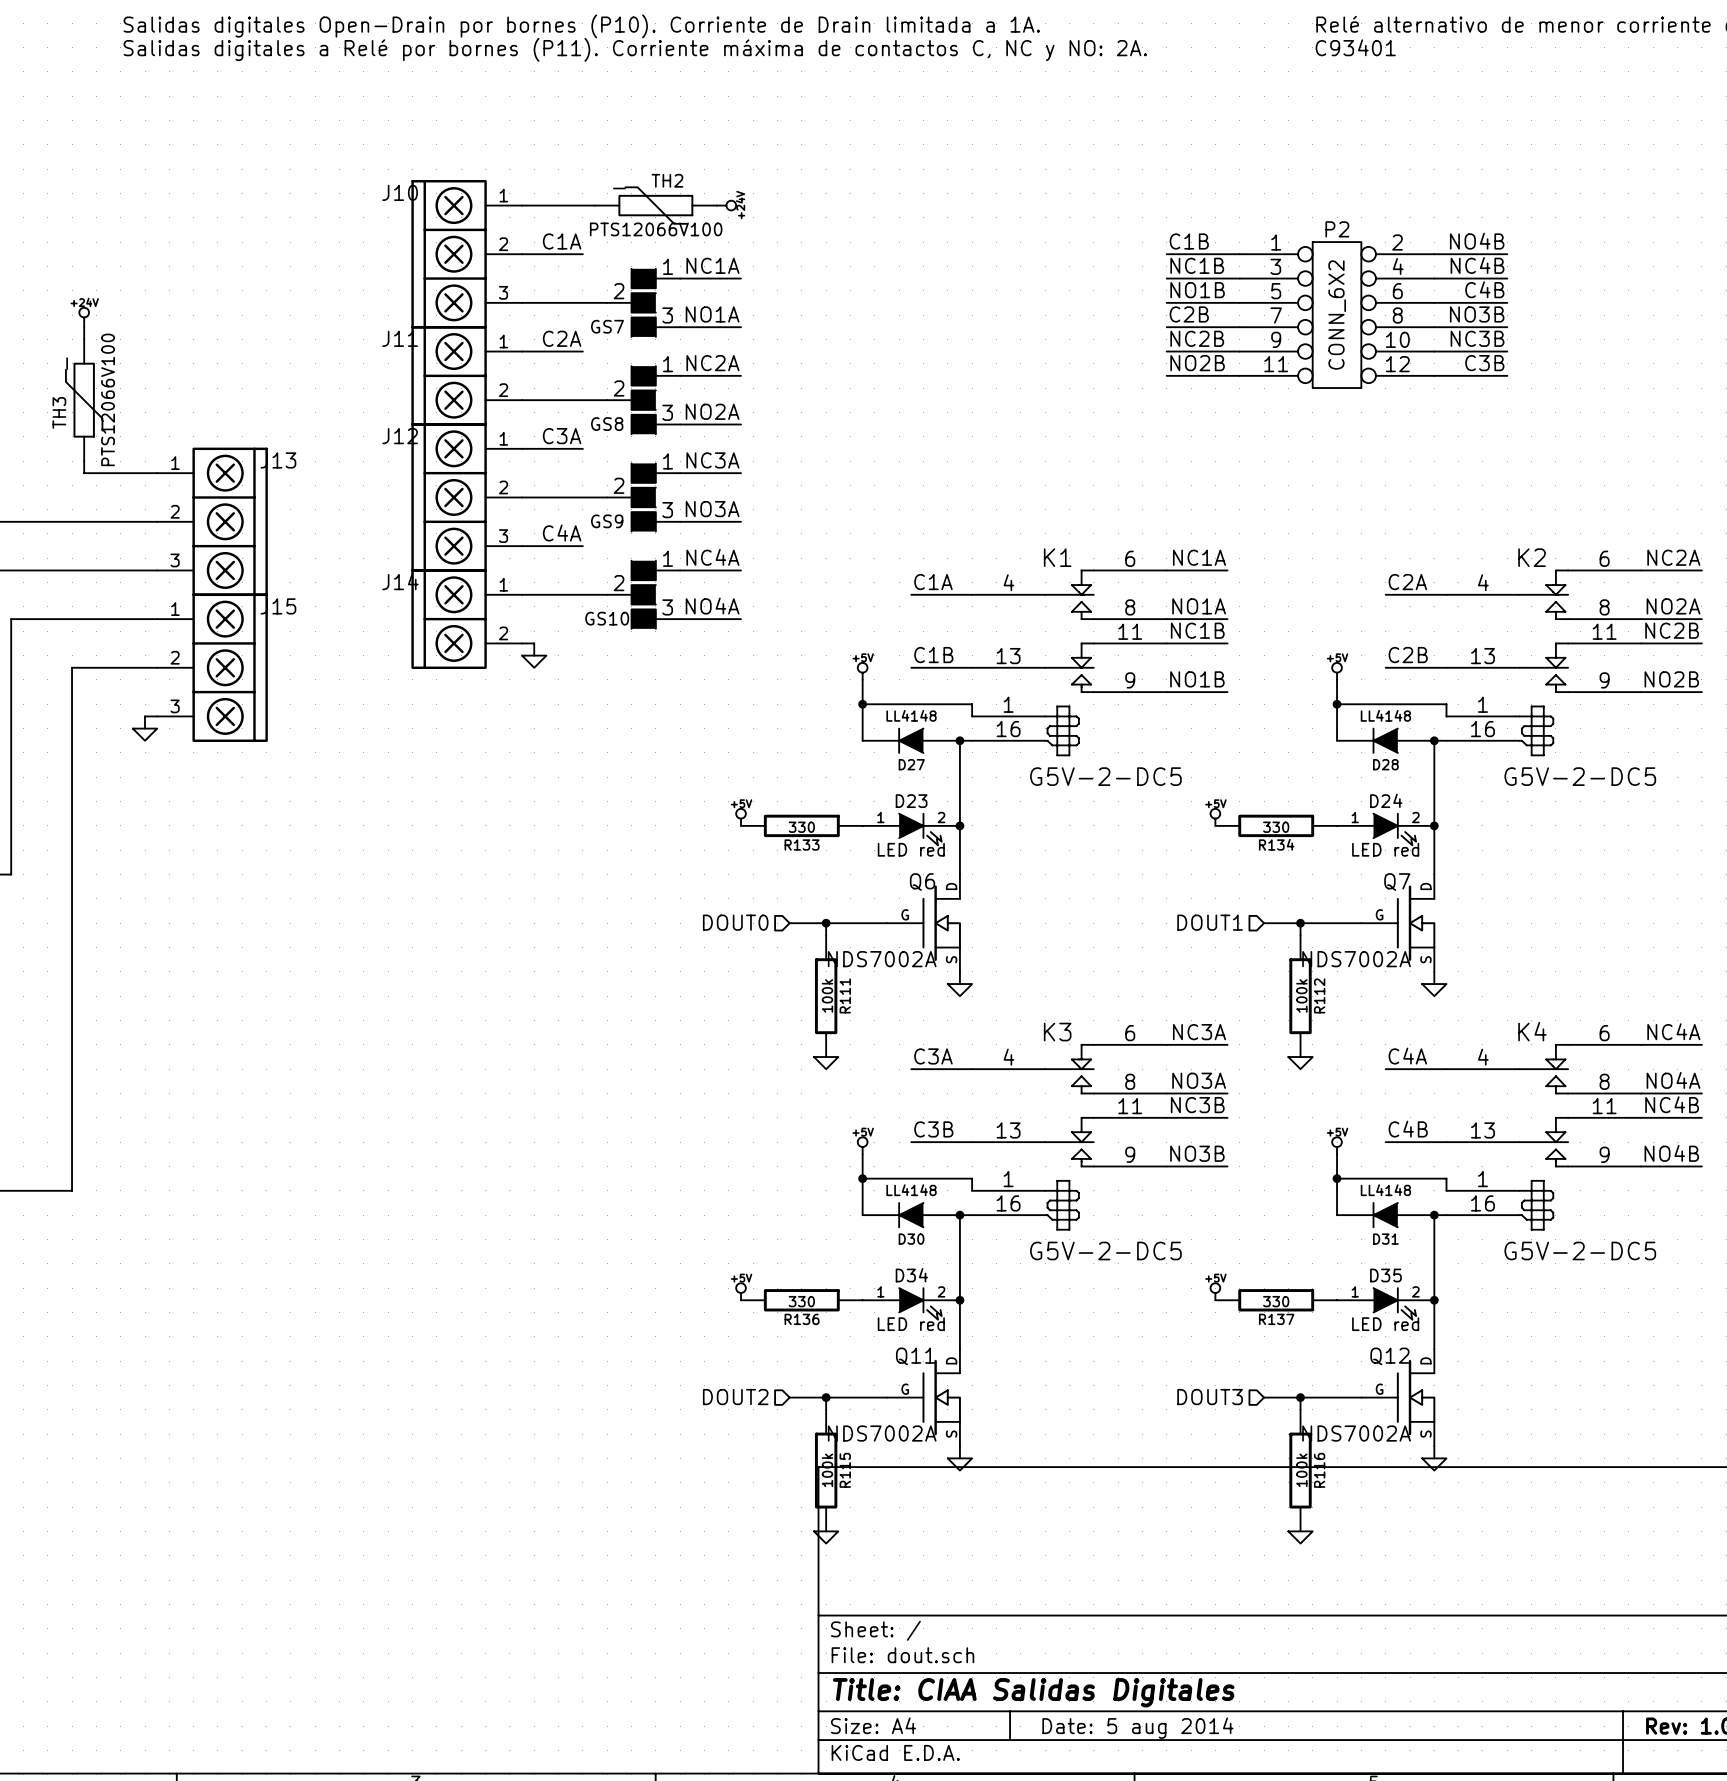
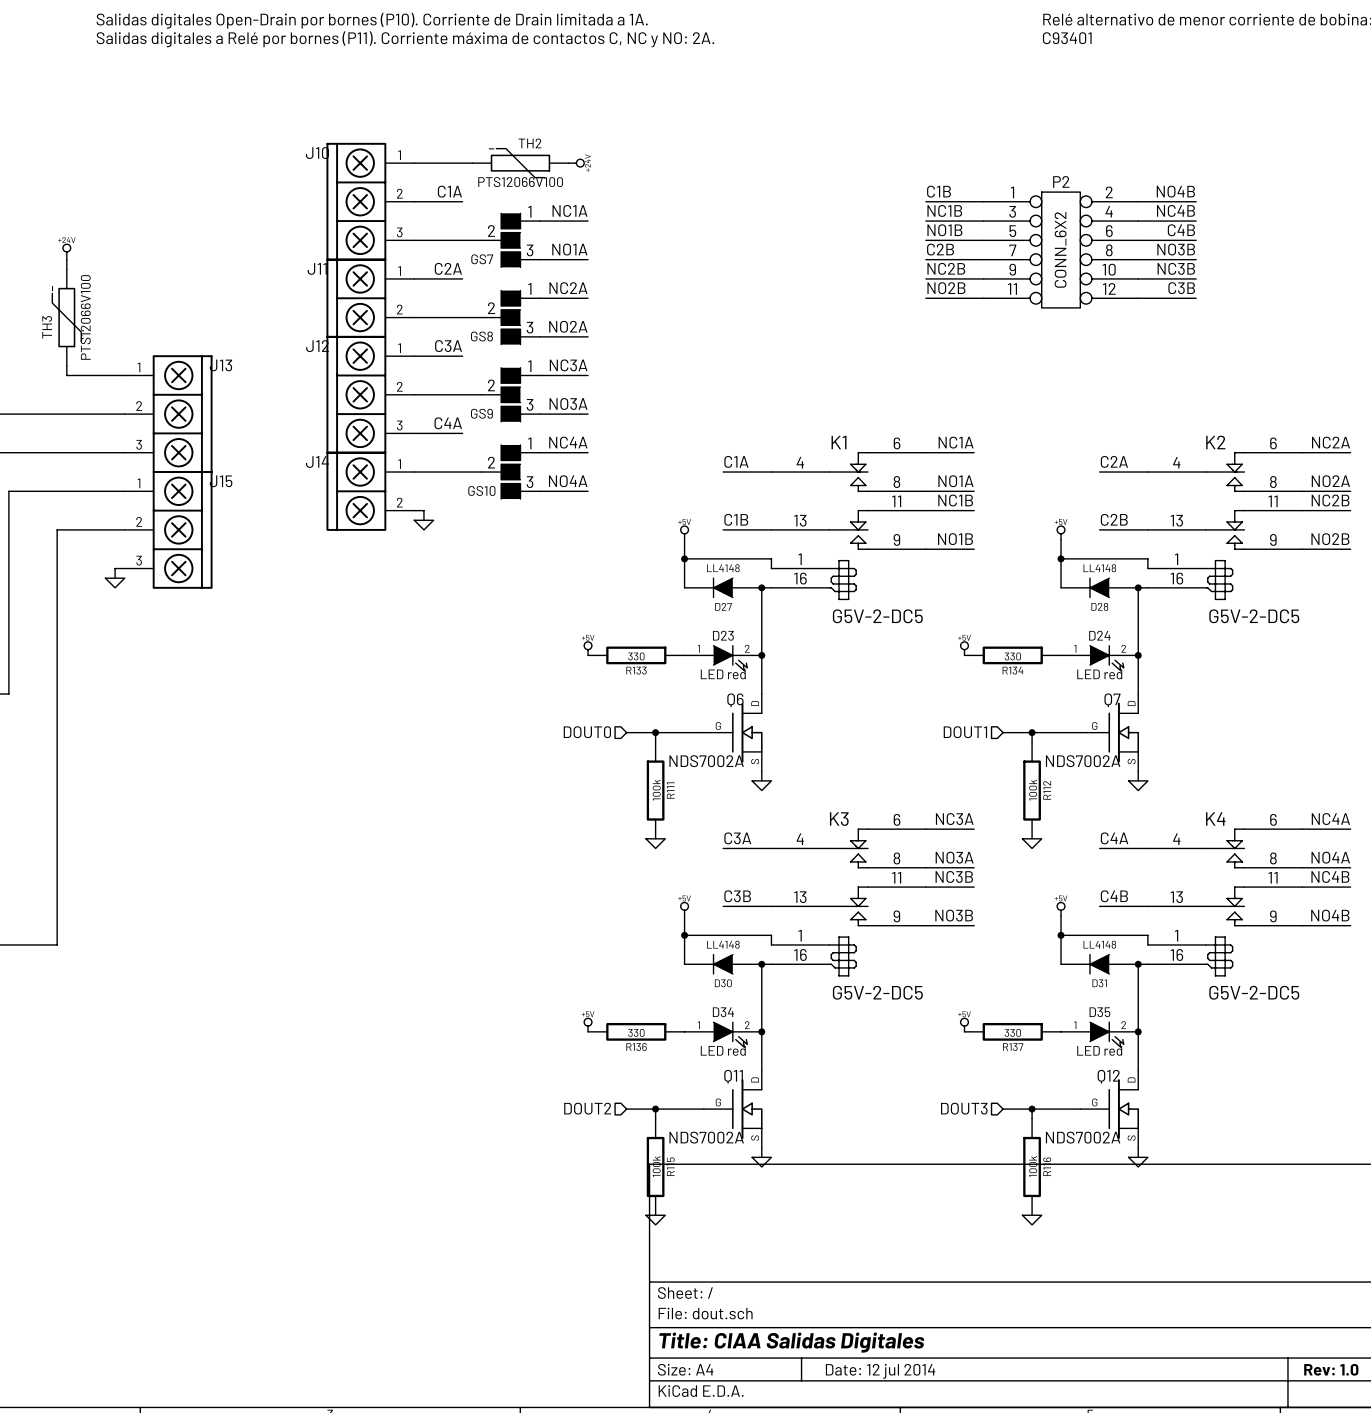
title block: Date: 5 aug 2014 (1137, 1728) -> Date: 12 jul 2014 (880, 1371)

